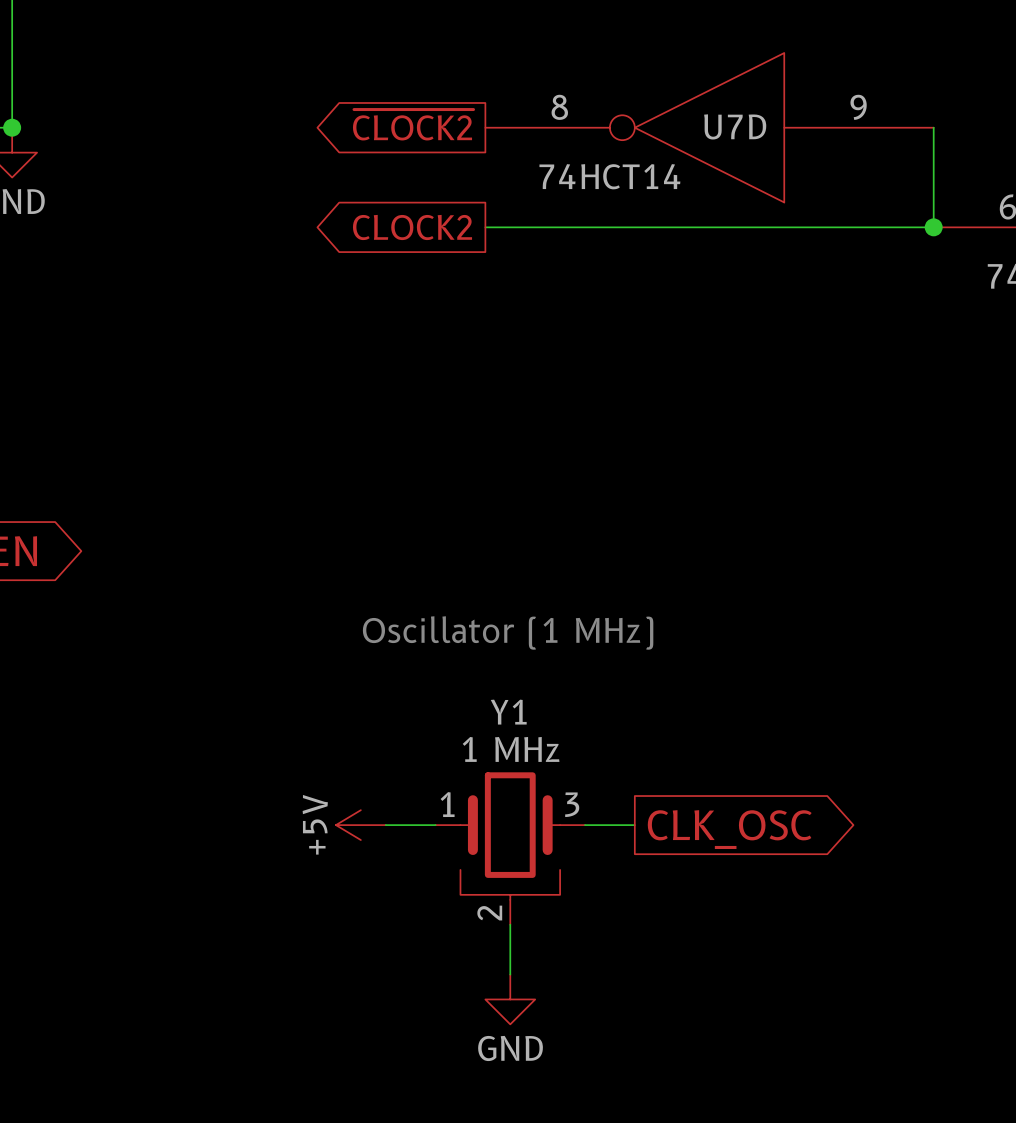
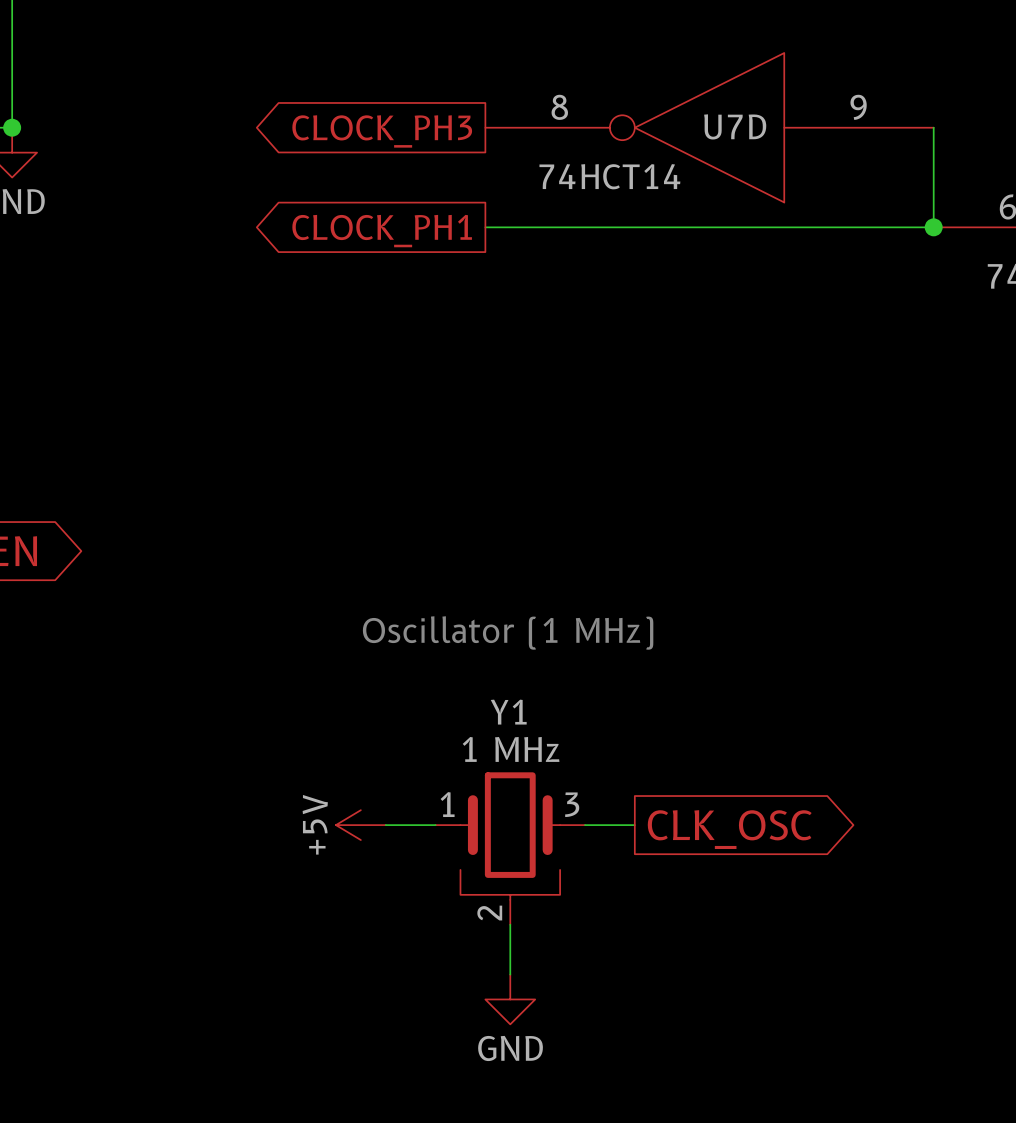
global label: ~{CLOCK2} (413, 124) -> CLOCK_PH3 (382, 131)
global label: CLOCK2 (412, 227) -> CLOCK_PH1 (382, 231)

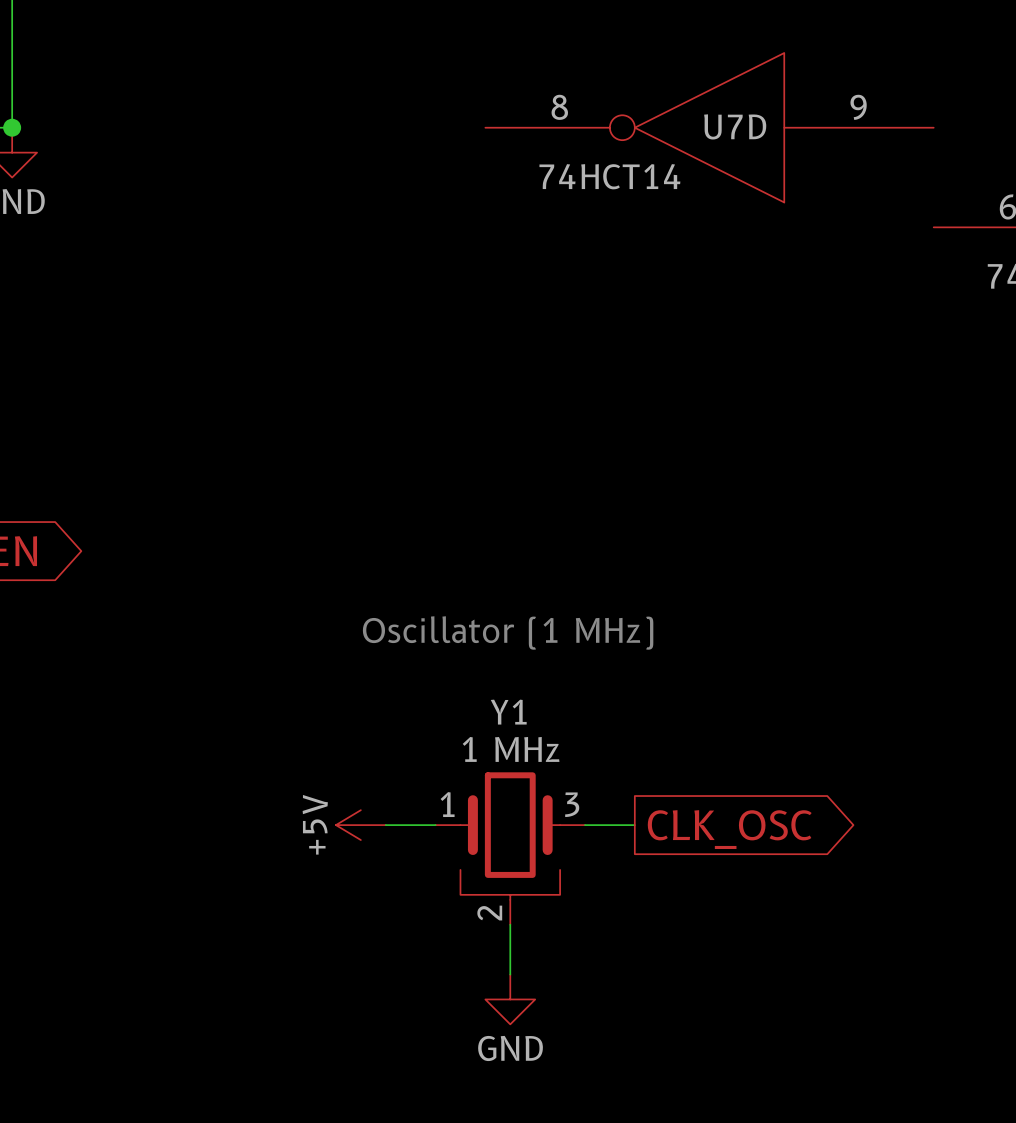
wire: (933, 127) (933, 227) (485, 227) -> none
global label: CLOCK_PH3 (382, 131) -> none
junction: (933, 227) -> none
global label: CLOCK_PH1 (382, 231) -> none

